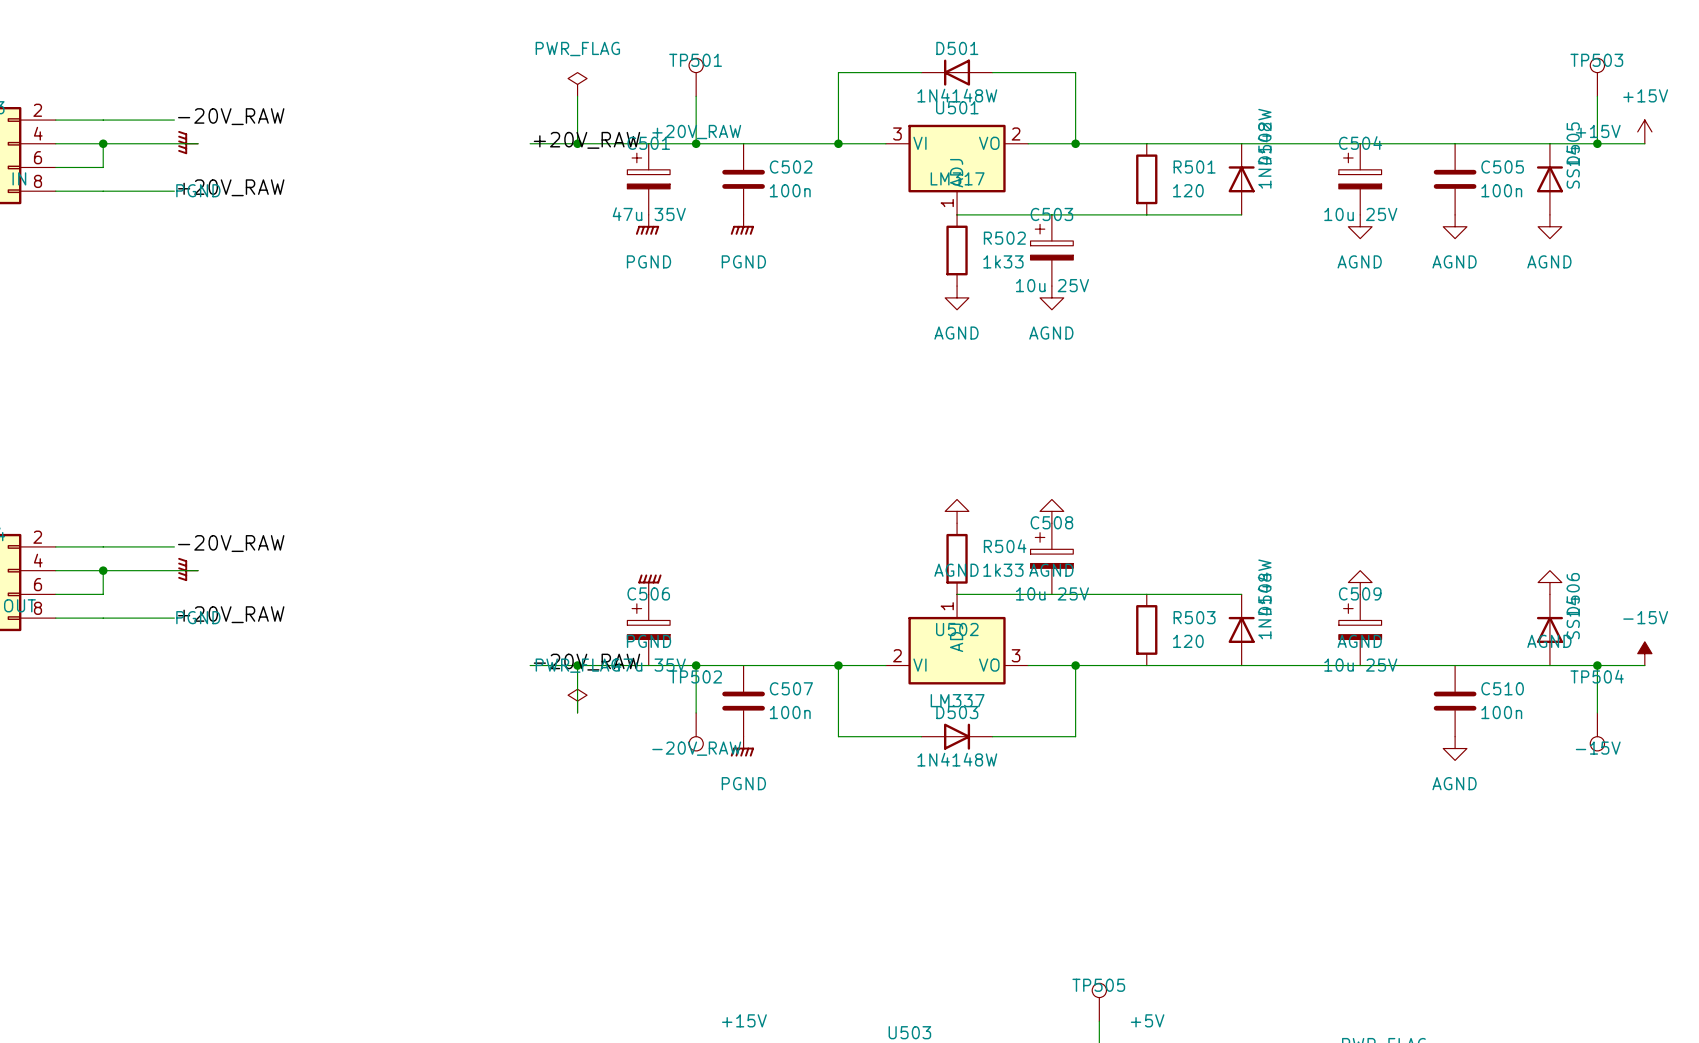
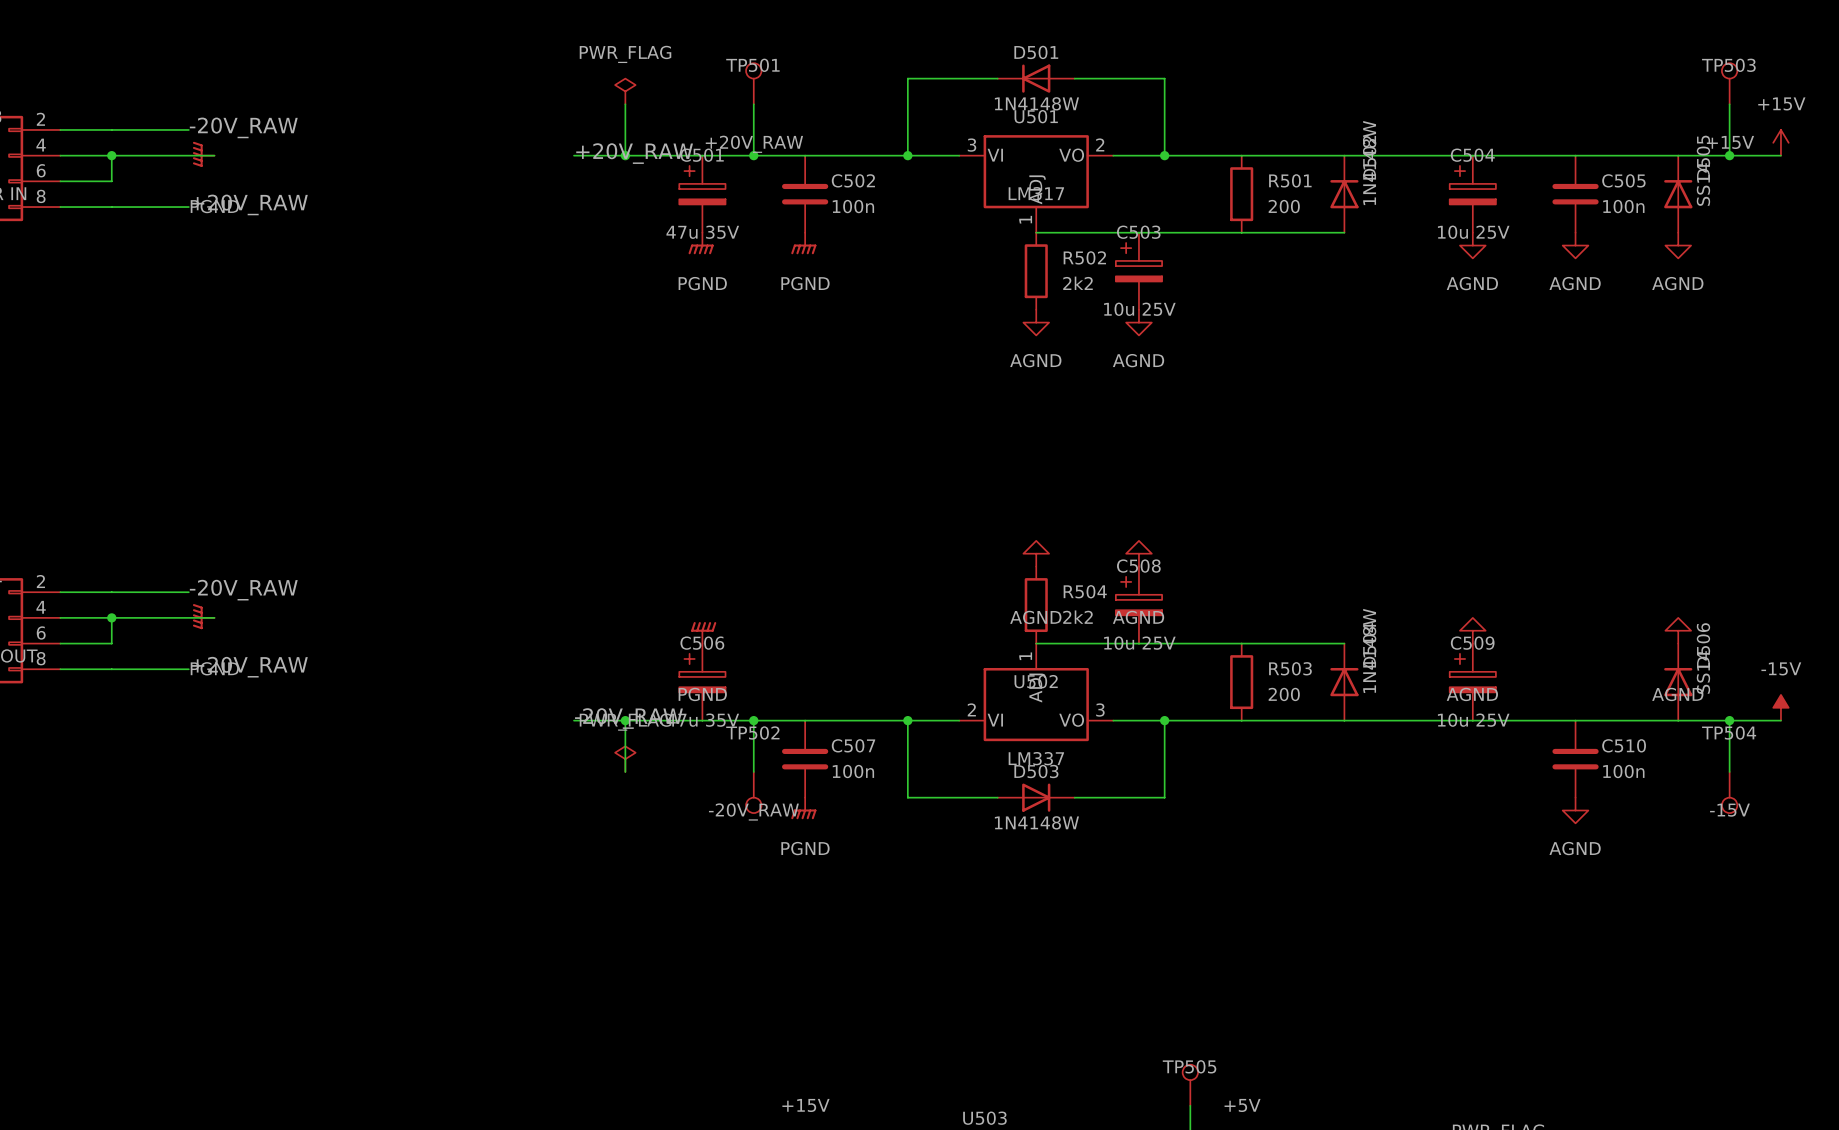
R501 value: 120 (1188, 190) -> 200 (1284, 206)
R502 value: 1k33 (1003, 261) -> 2k2 (1078, 283)
R504 value: 1k33 (1003, 570) -> 2k2 (1078, 617)
R503 value: 120 (1188, 641) -> 200 (1284, 694)

